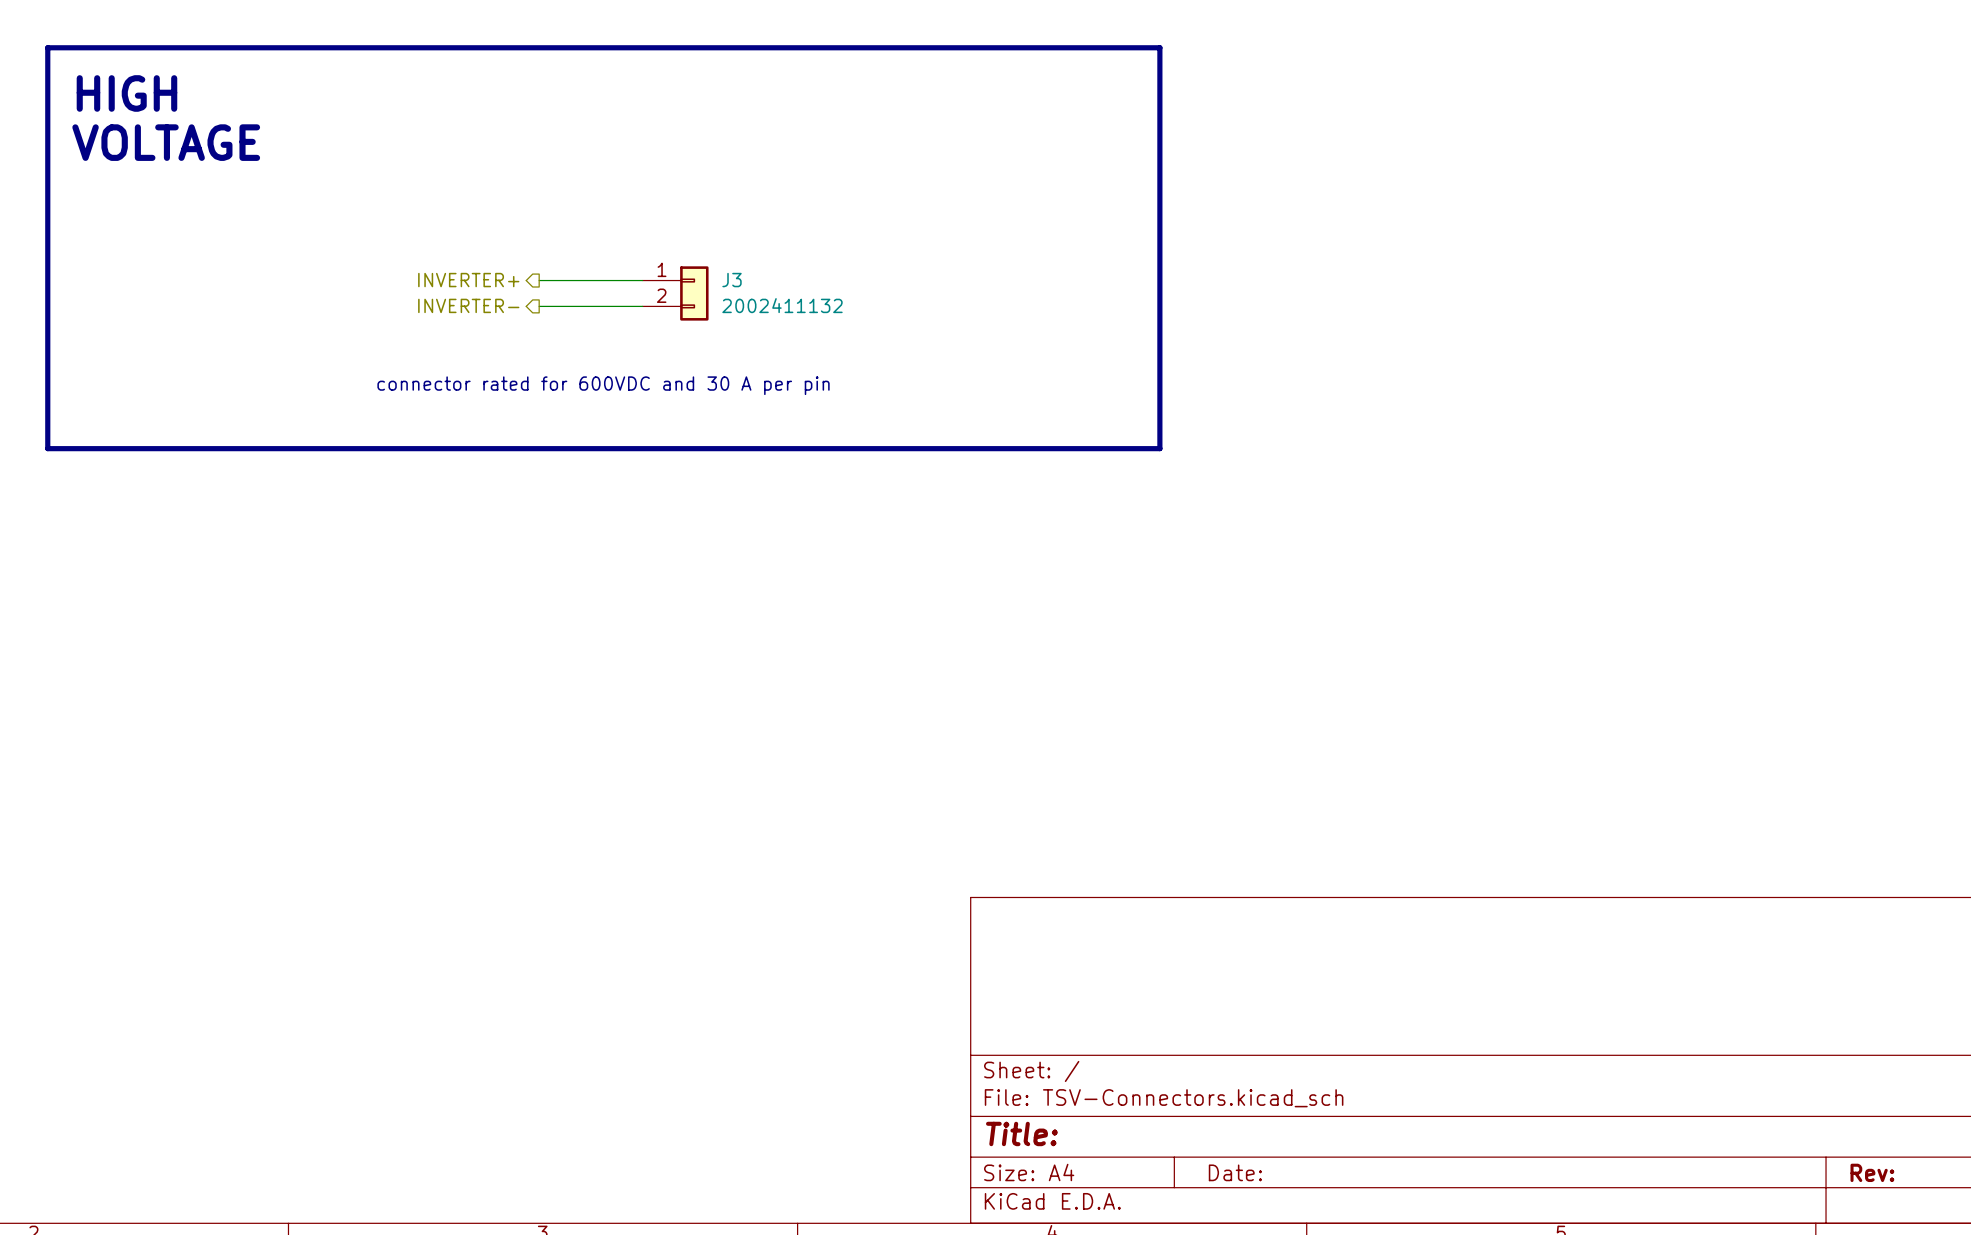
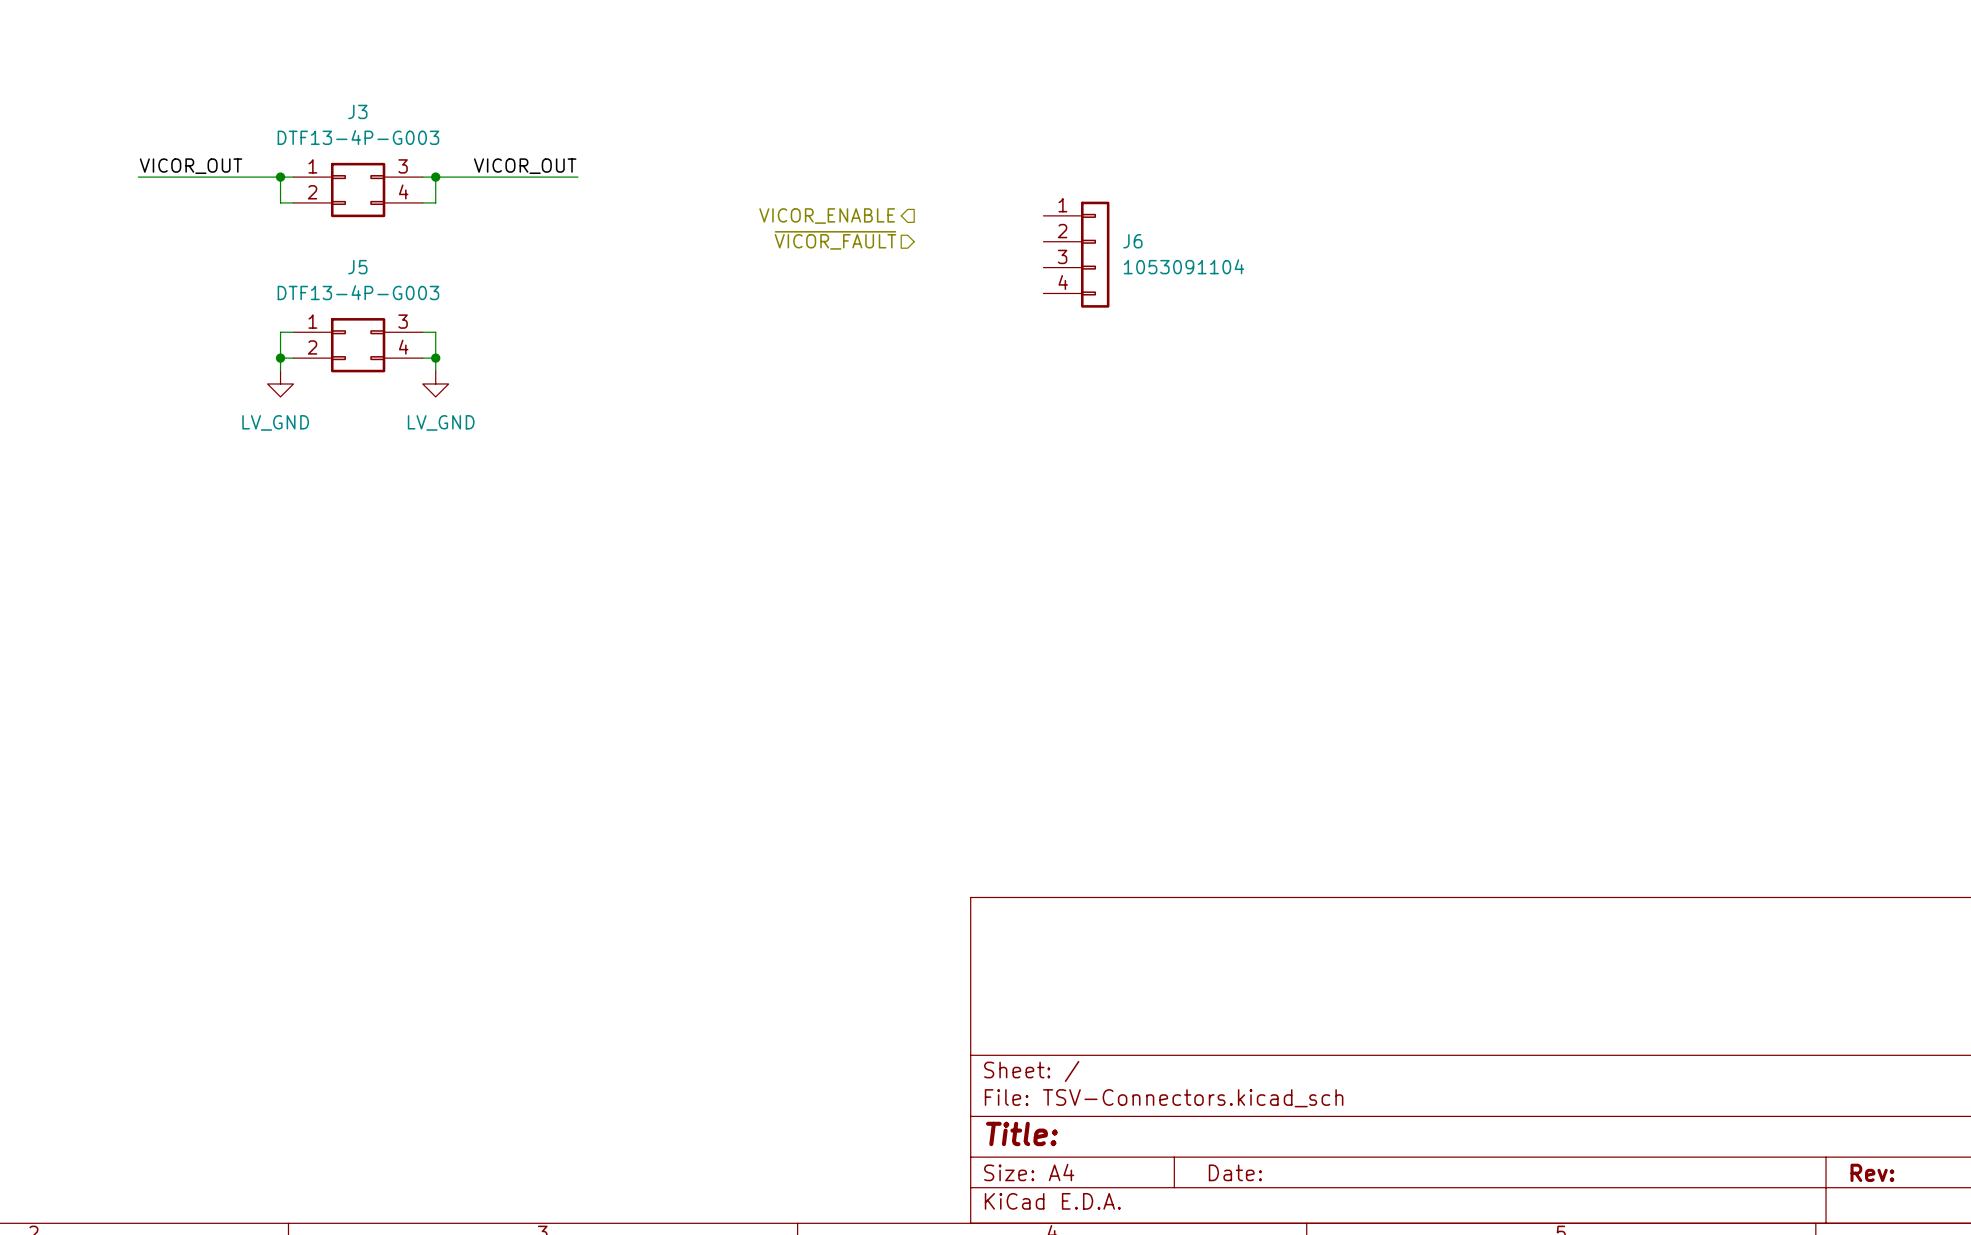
line: (47, 47) (1159, 47) (1159, 448) (47, 448) (47, 47) -> none
text: HIGH (126, 93) -> none
text: VOLTAGE (166, 142) -> none
label: none -> VICOR_OUT (191, 166)
label: none -> VICOR_OUT (525, 166)
wire: none -> (138, 177) (293, 177)
wire: none -> (280, 177) (280, 202) (293, 202)
junction: none -> (280, 177)
wire: none -> (422, 177) (577, 177)
wire: none -> (435, 177) (435, 202) (422, 202)
junction: none -> (435, 177)
hierarchical label: none -> VICOR_ENABLE (827, 216)
hierarchical label: none -> ~{VICOR_FAULT} (835, 240)
J6: none -> 1053091104 (1076, 254)
J3 symbol: [642, 266, 709, 321] -> [293, 162, 423, 218]
hierarchical label: INVERTER+ (468, 280) -> none
wire: (539, 280) (642, 280) -> none
J3 name position: J3 (732, 280) -> J3 (357, 111)
hierarchical label: INVERTER- (468, 305) -> none
J3 value: 2002411132 (782, 305) -> DTF13-4P-G003 (358, 137)
wire: (539, 306) (642, 306) -> none
wire: none -> (293, 332) (280, 332) (280, 371)
wire: none -> (422, 332) (435, 332) (435, 371)
J5: none -> DTF13-4P-G003 (358, 345)
wire: none -> (280, 358) (293, 358)
junction: none -> (280, 358)
wire: none -> (422, 358) (435, 358)
junction: none -> (435, 358)
power symbol: none -> LV_GND (280, 383)
power symbol: none -> LV_GND (435, 383)
text: connector rated for 600VDC and 30 A per pin (603, 385) -> none

